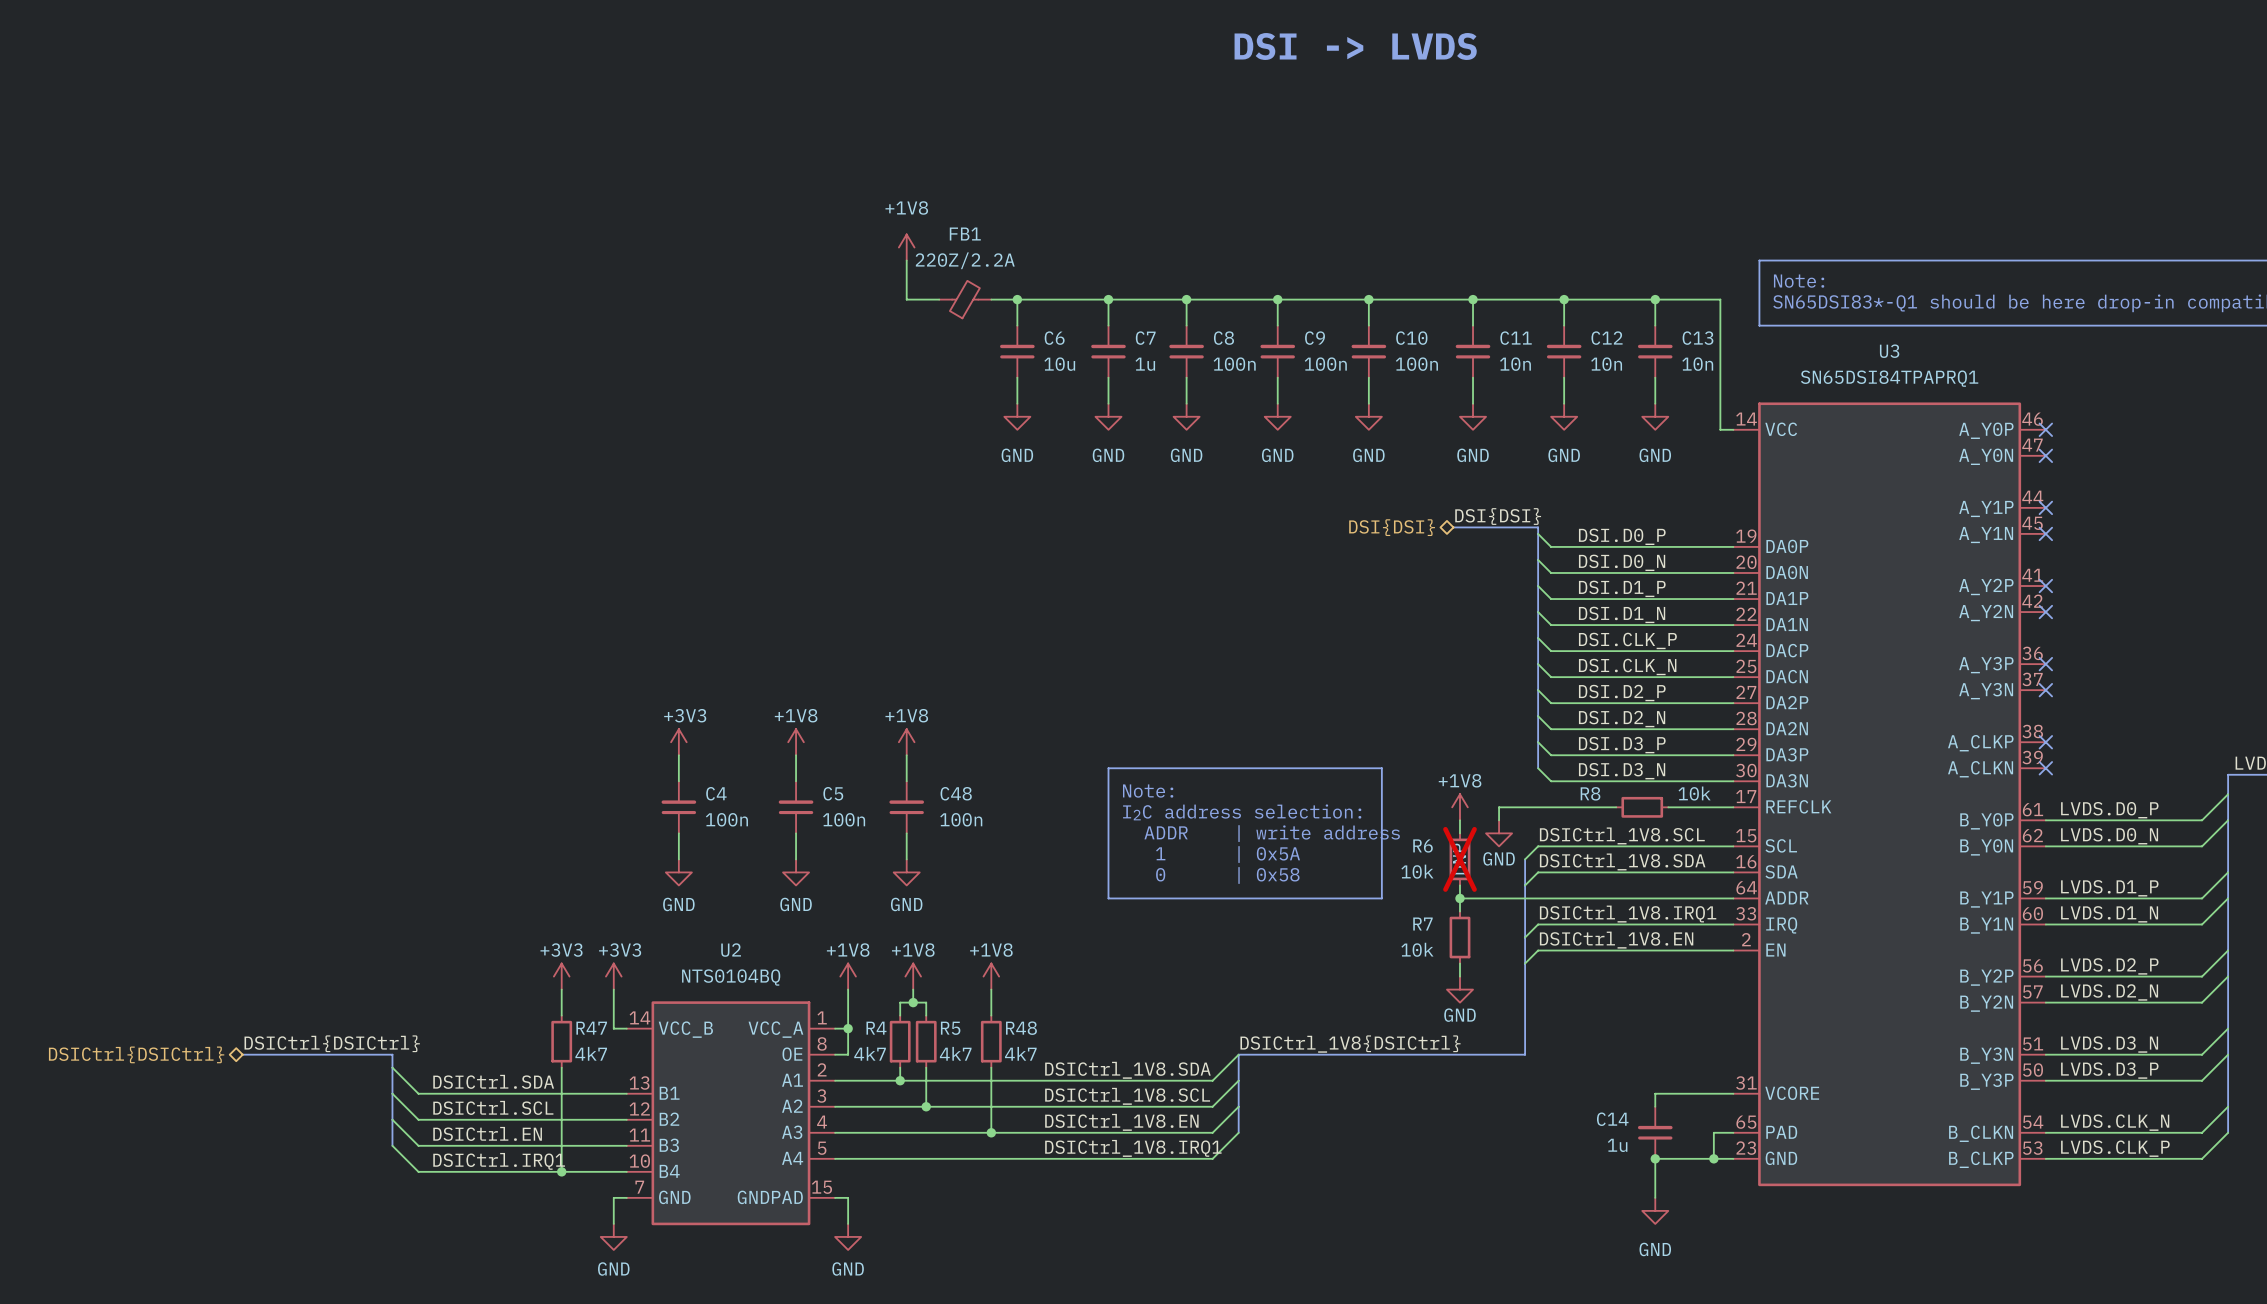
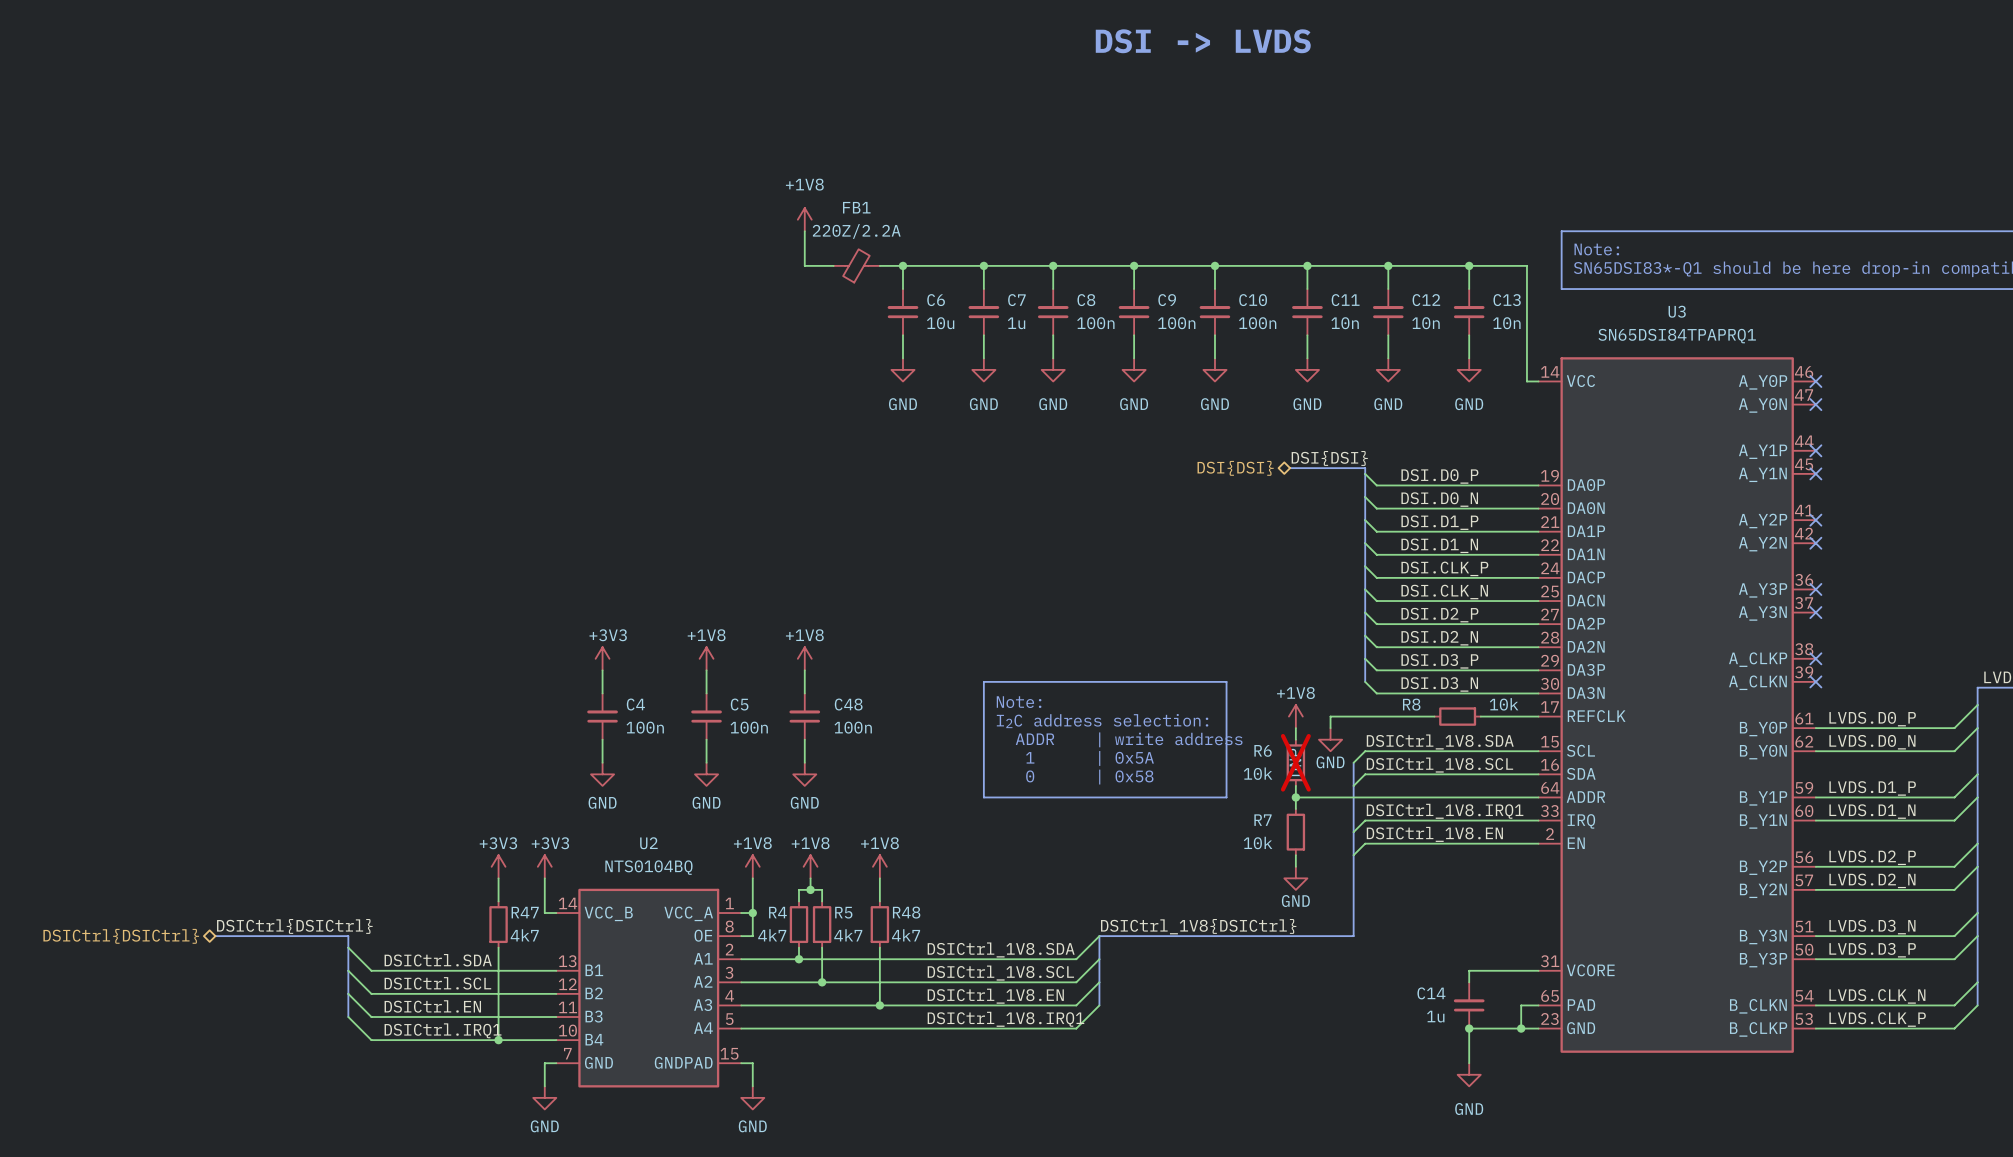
label: DSICtrl_1V8.SCL (1622, 835) -> DSICtrl_1V8.SDA (1440, 741)
label: DSICtrl_1V8.SDA (1622, 861) -> DSICtrl_1V8.SCL (1439, 765)

